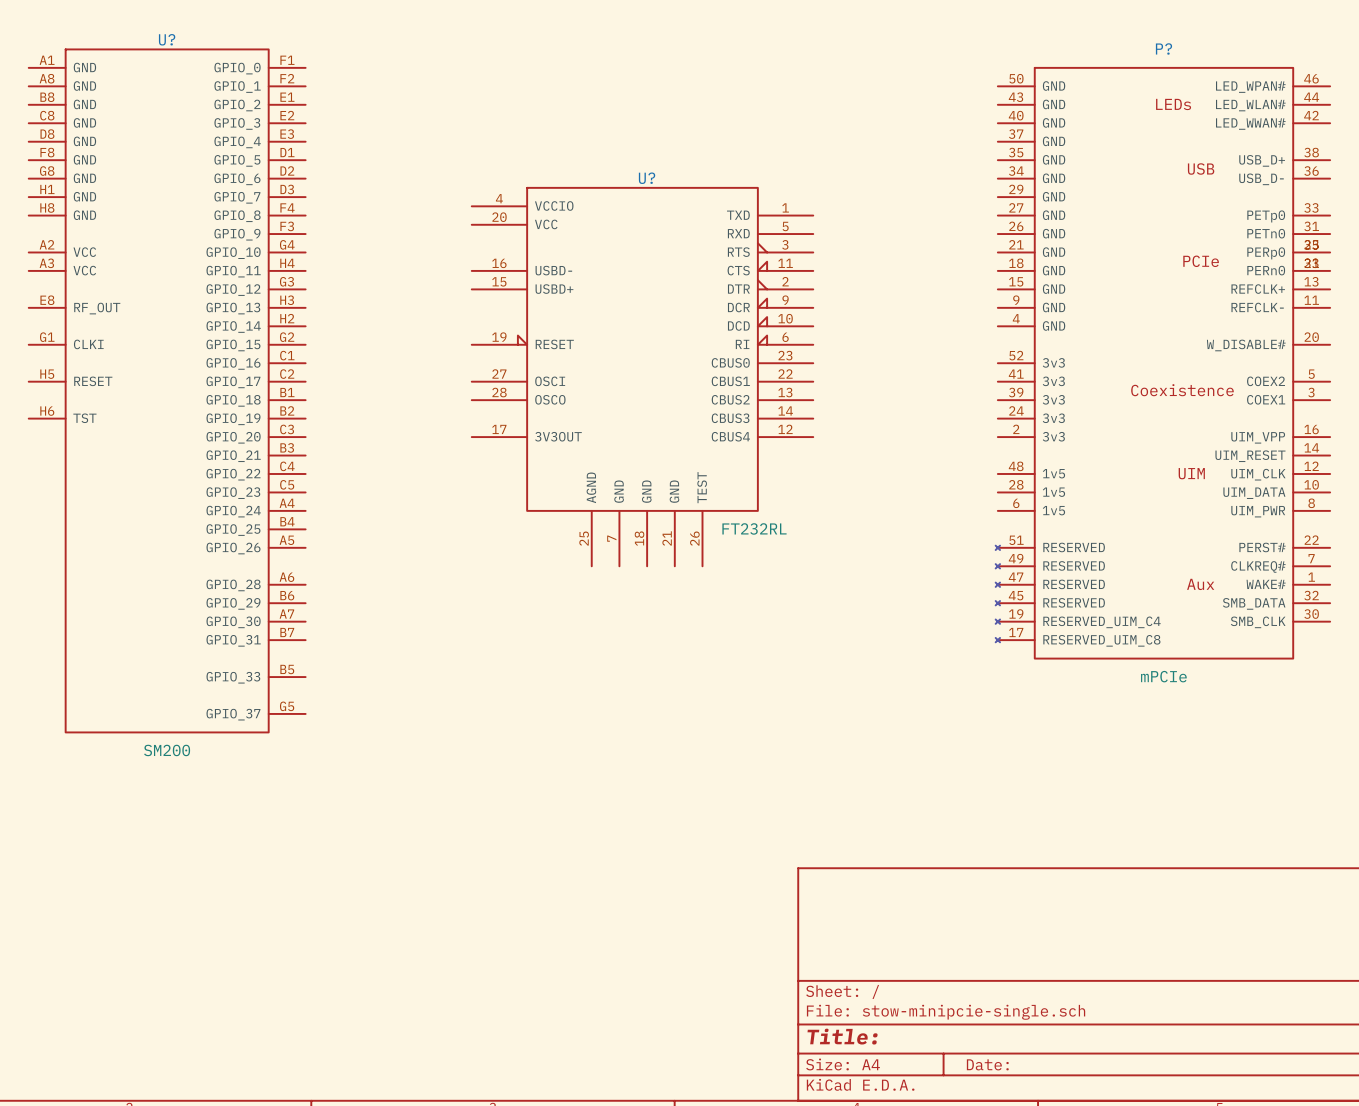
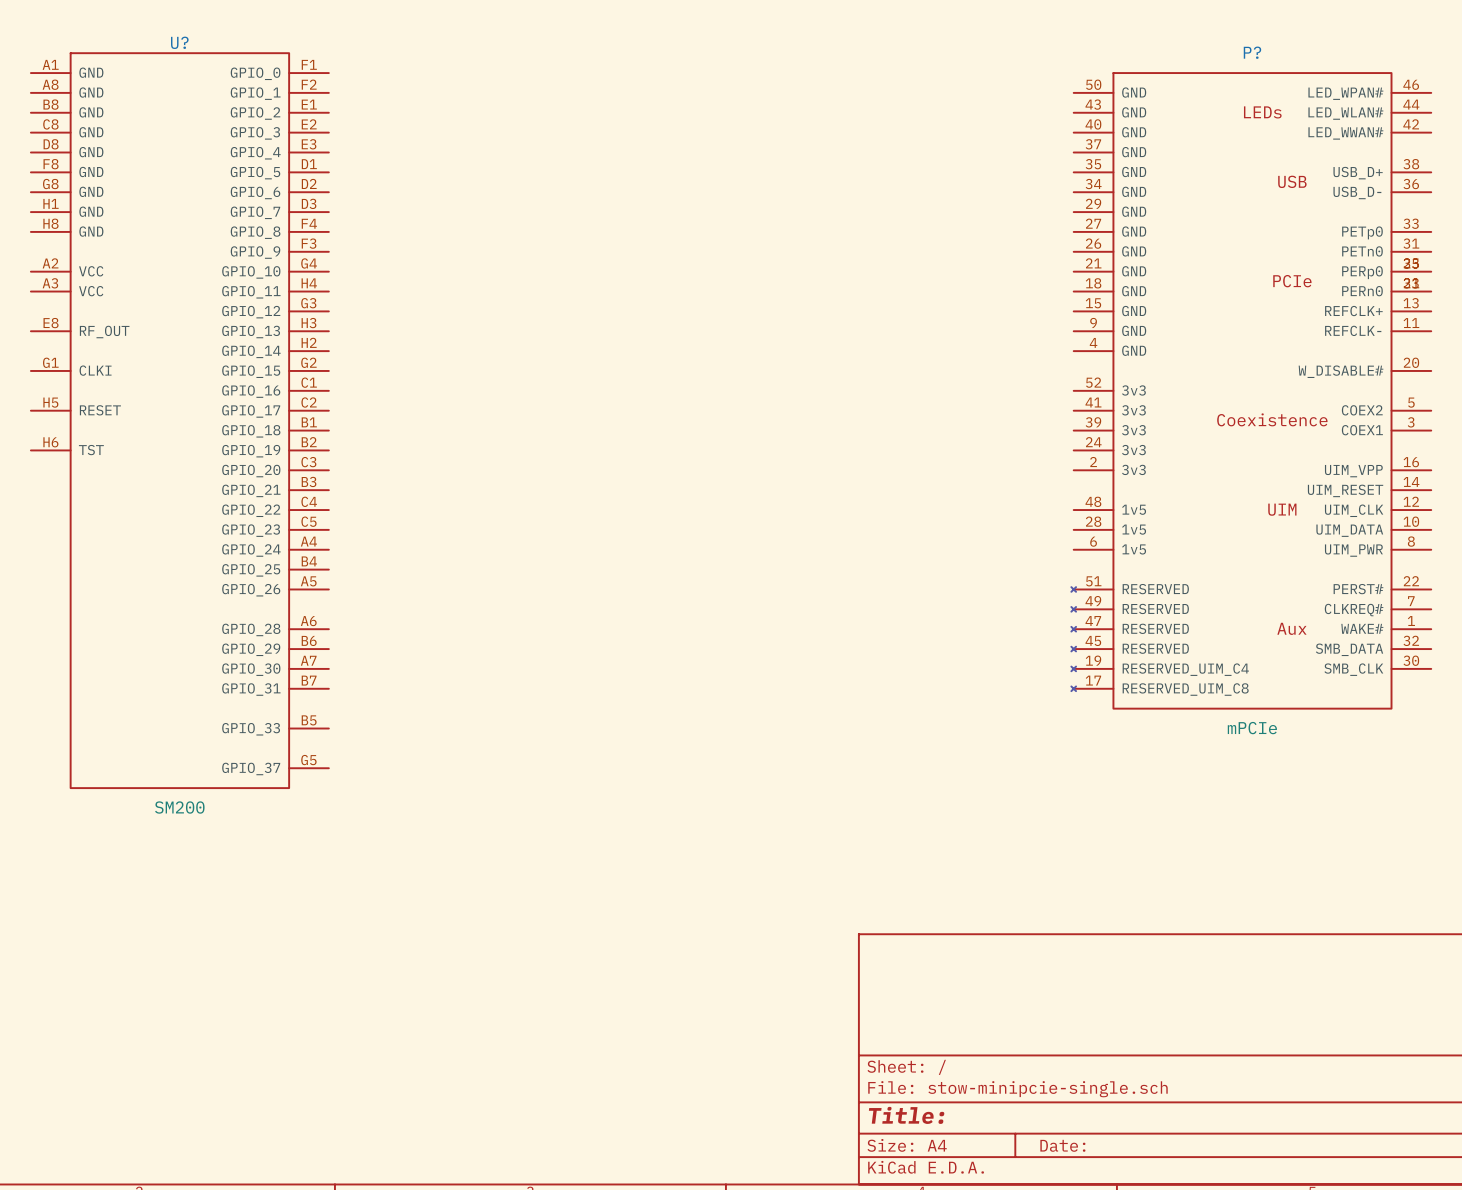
U?: FT232RL (642, 377) -> none

